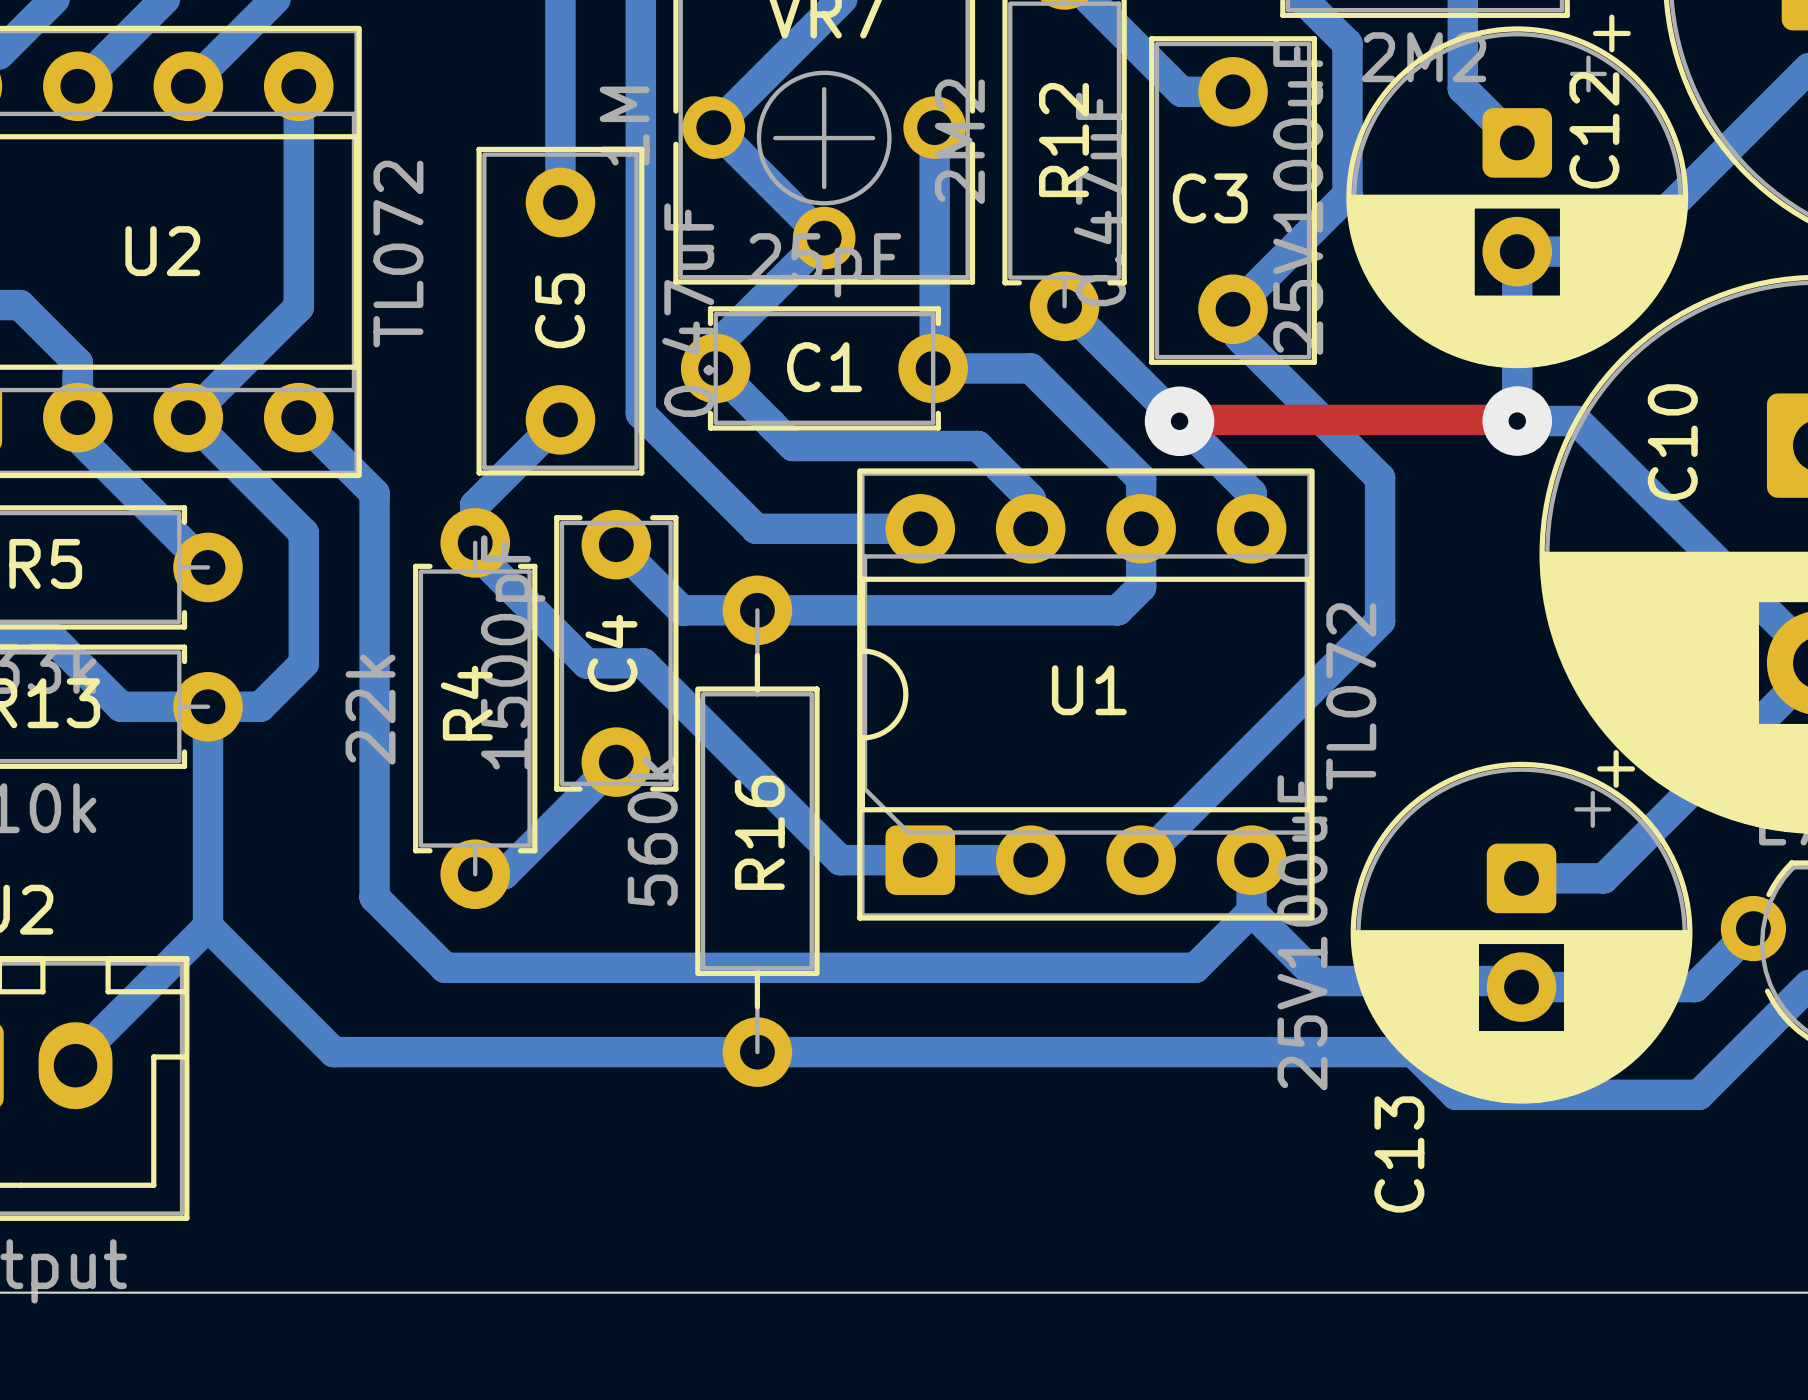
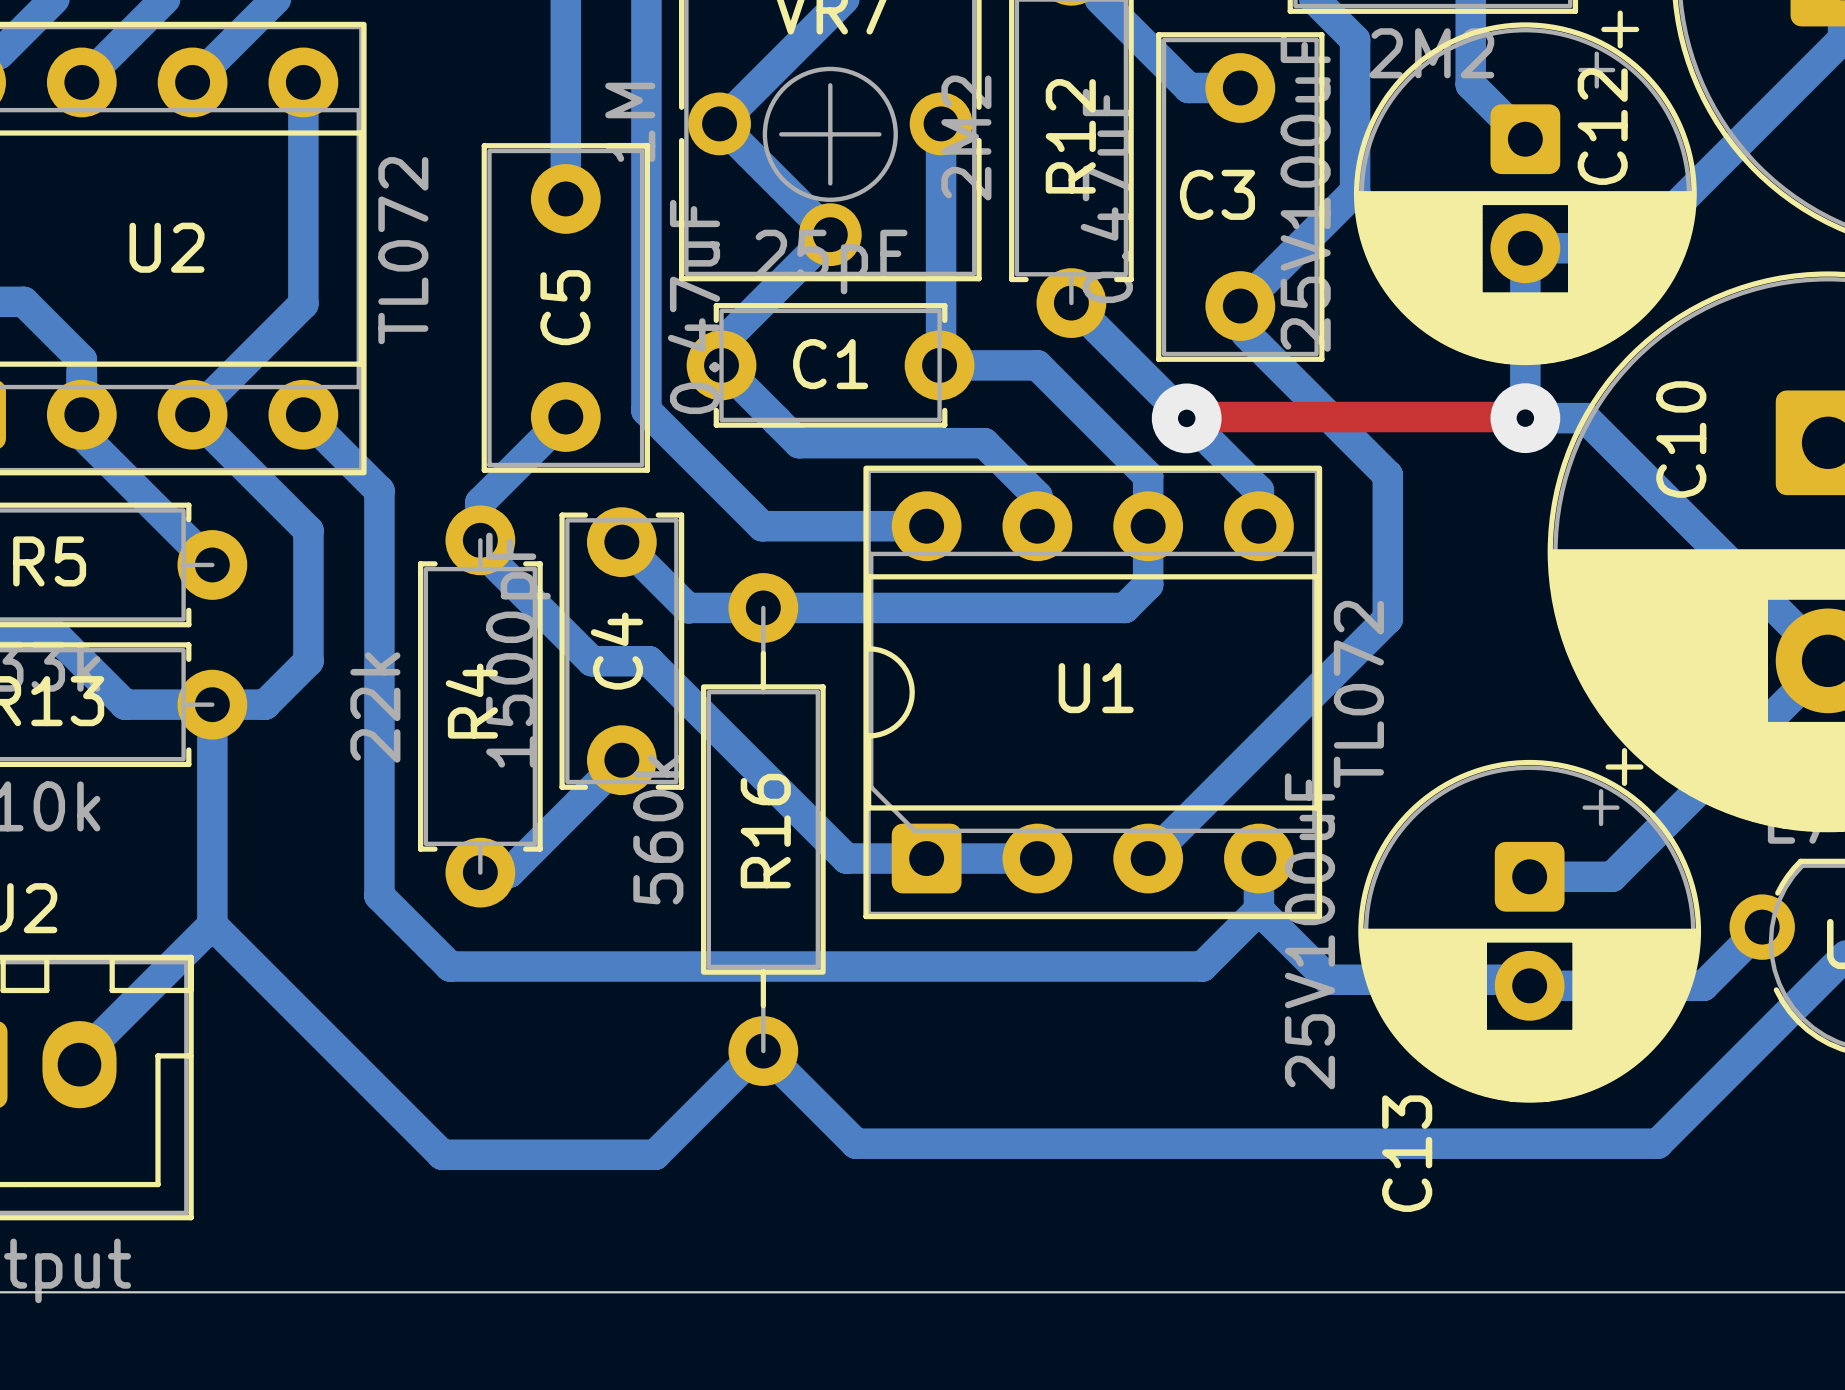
bottom track: (333, 1052) (753, 1052) -> (338, 1051) (442, 1154) (655, 1154) (758, 1051)
bottom track: (757, 1052) (1413, 1052) (1455, 1094) (1698, 1094) -> (763, 1051) (856, 1143) (1657, 1143) (1707, 1093)

